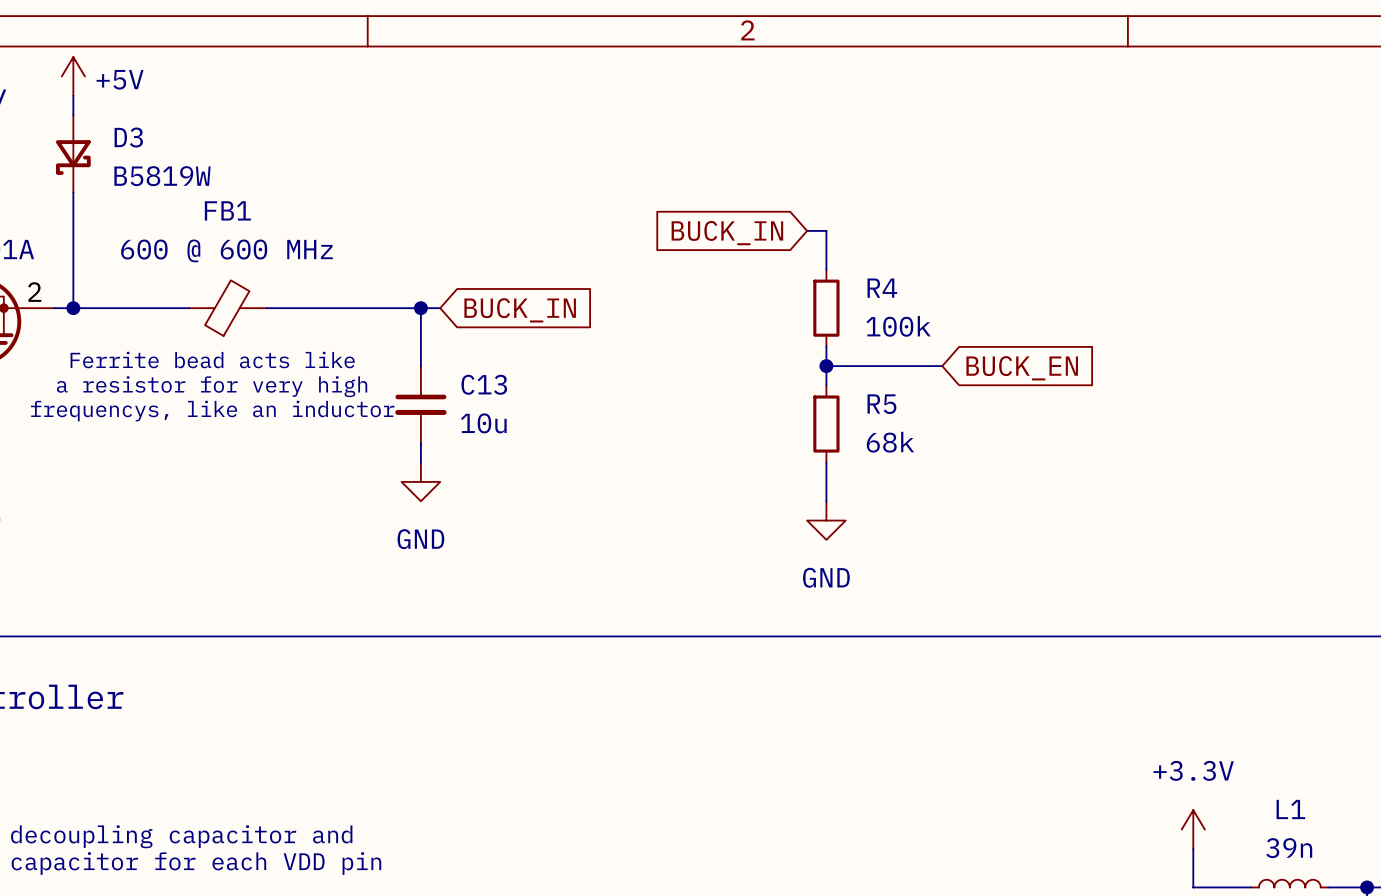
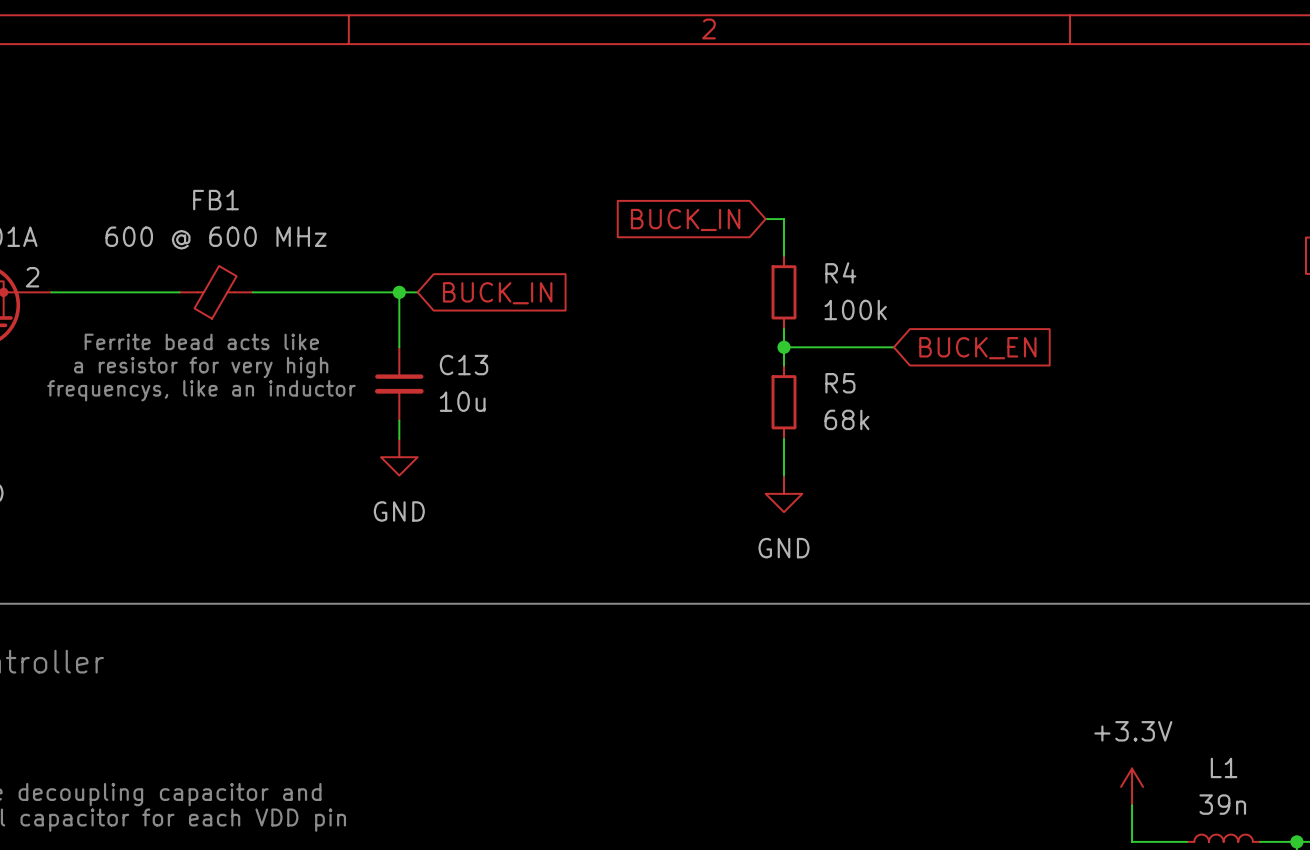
power symbol: +5V (73, 76) -> none
wire: (73, 95) (73, 115) -> none
D3: B5819W (73, 153) -> none
wire: (73, 192) (73, 308) -> none
junction: (73, 308) -> none

